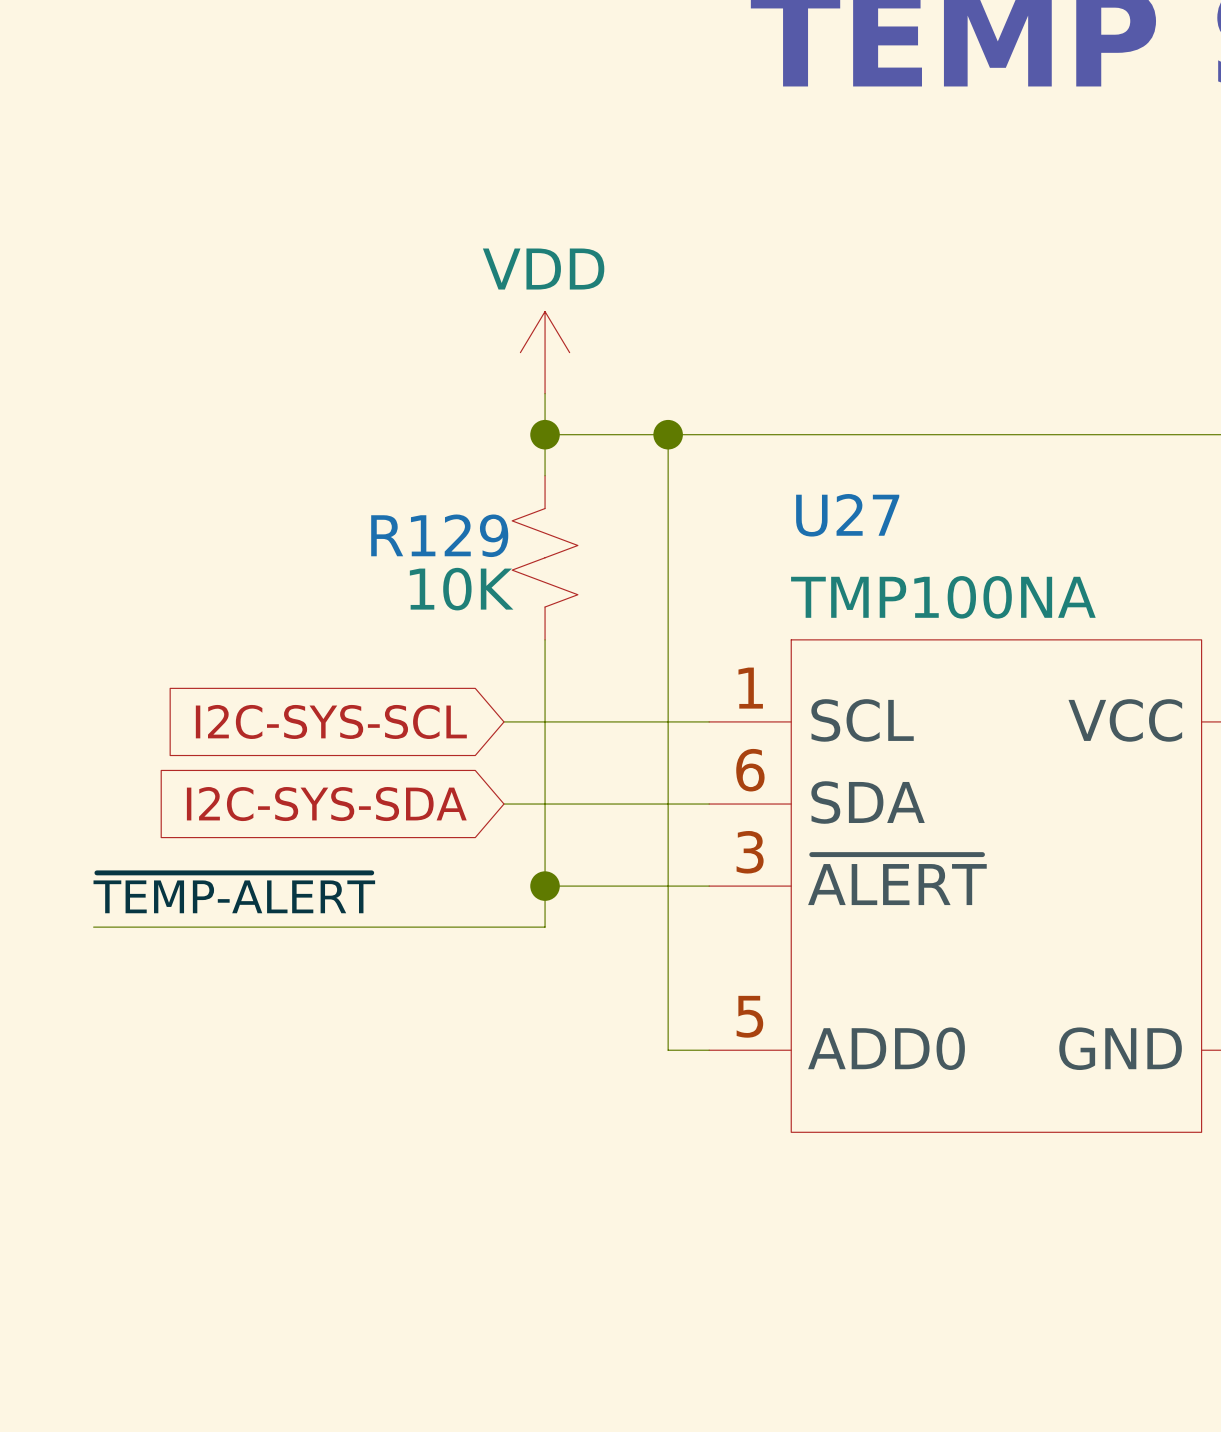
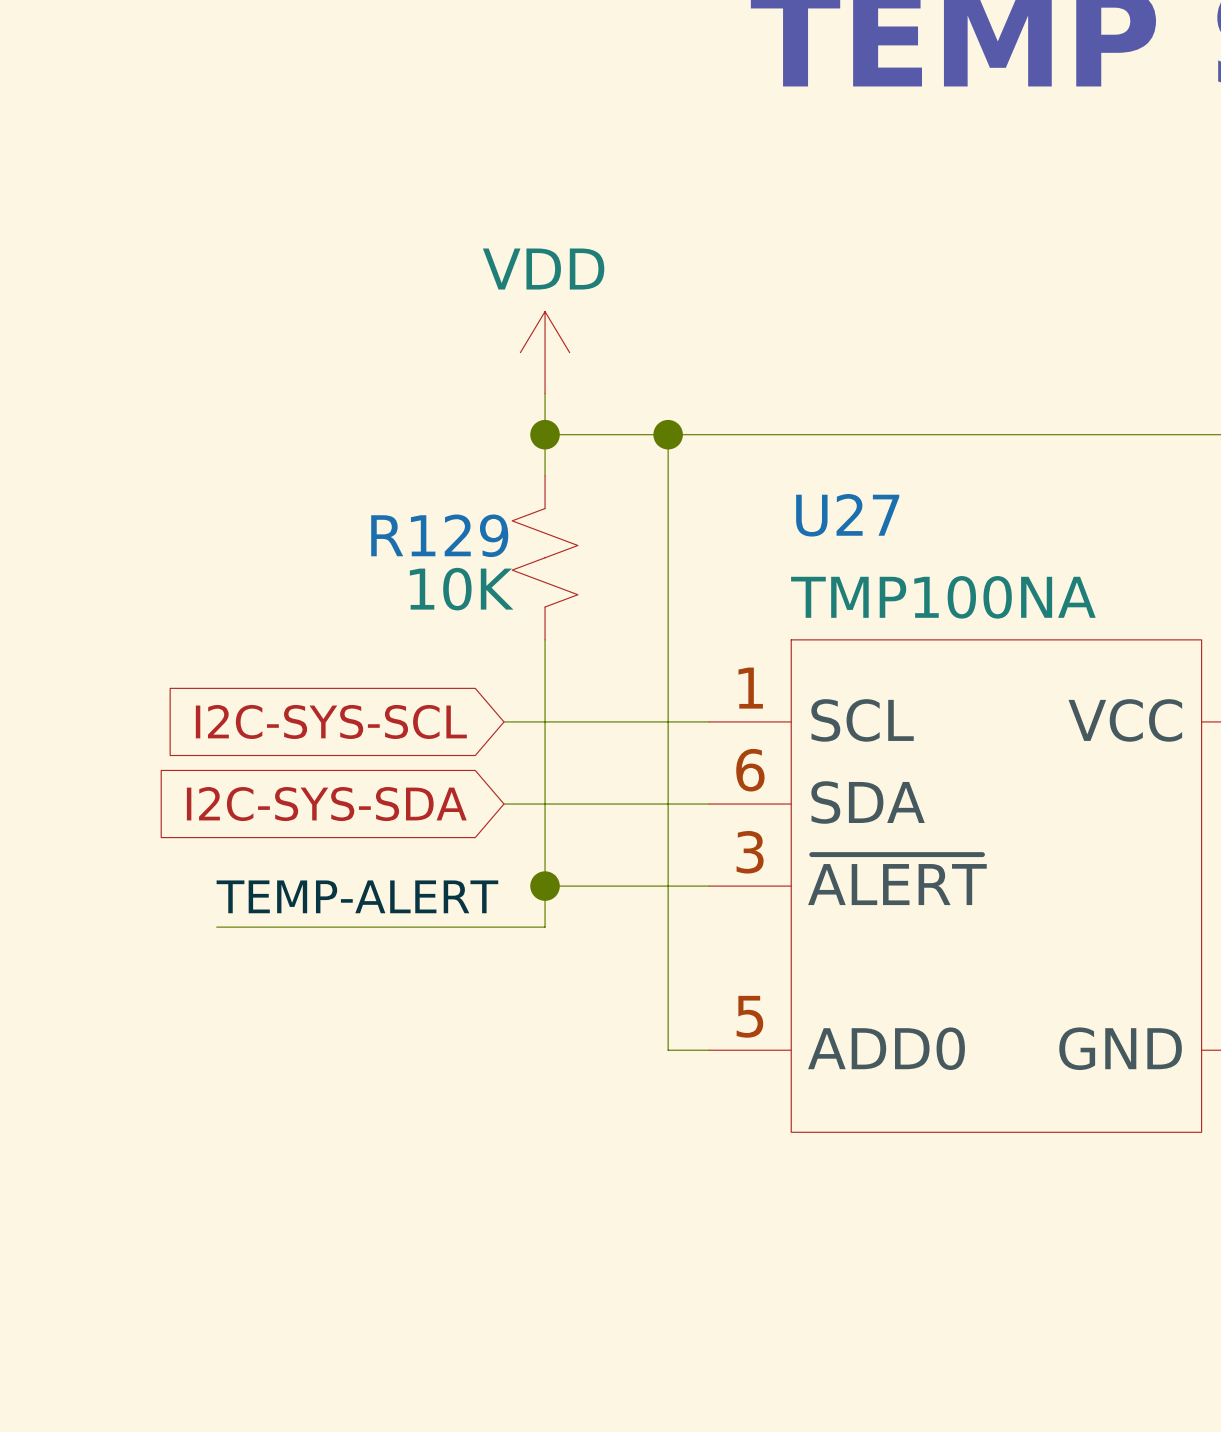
label: ~{TEMP-ALERT} (234, 893) -> TEMP-ALERT (357, 896)
wire: (93, 927) (216, 927) -> none

